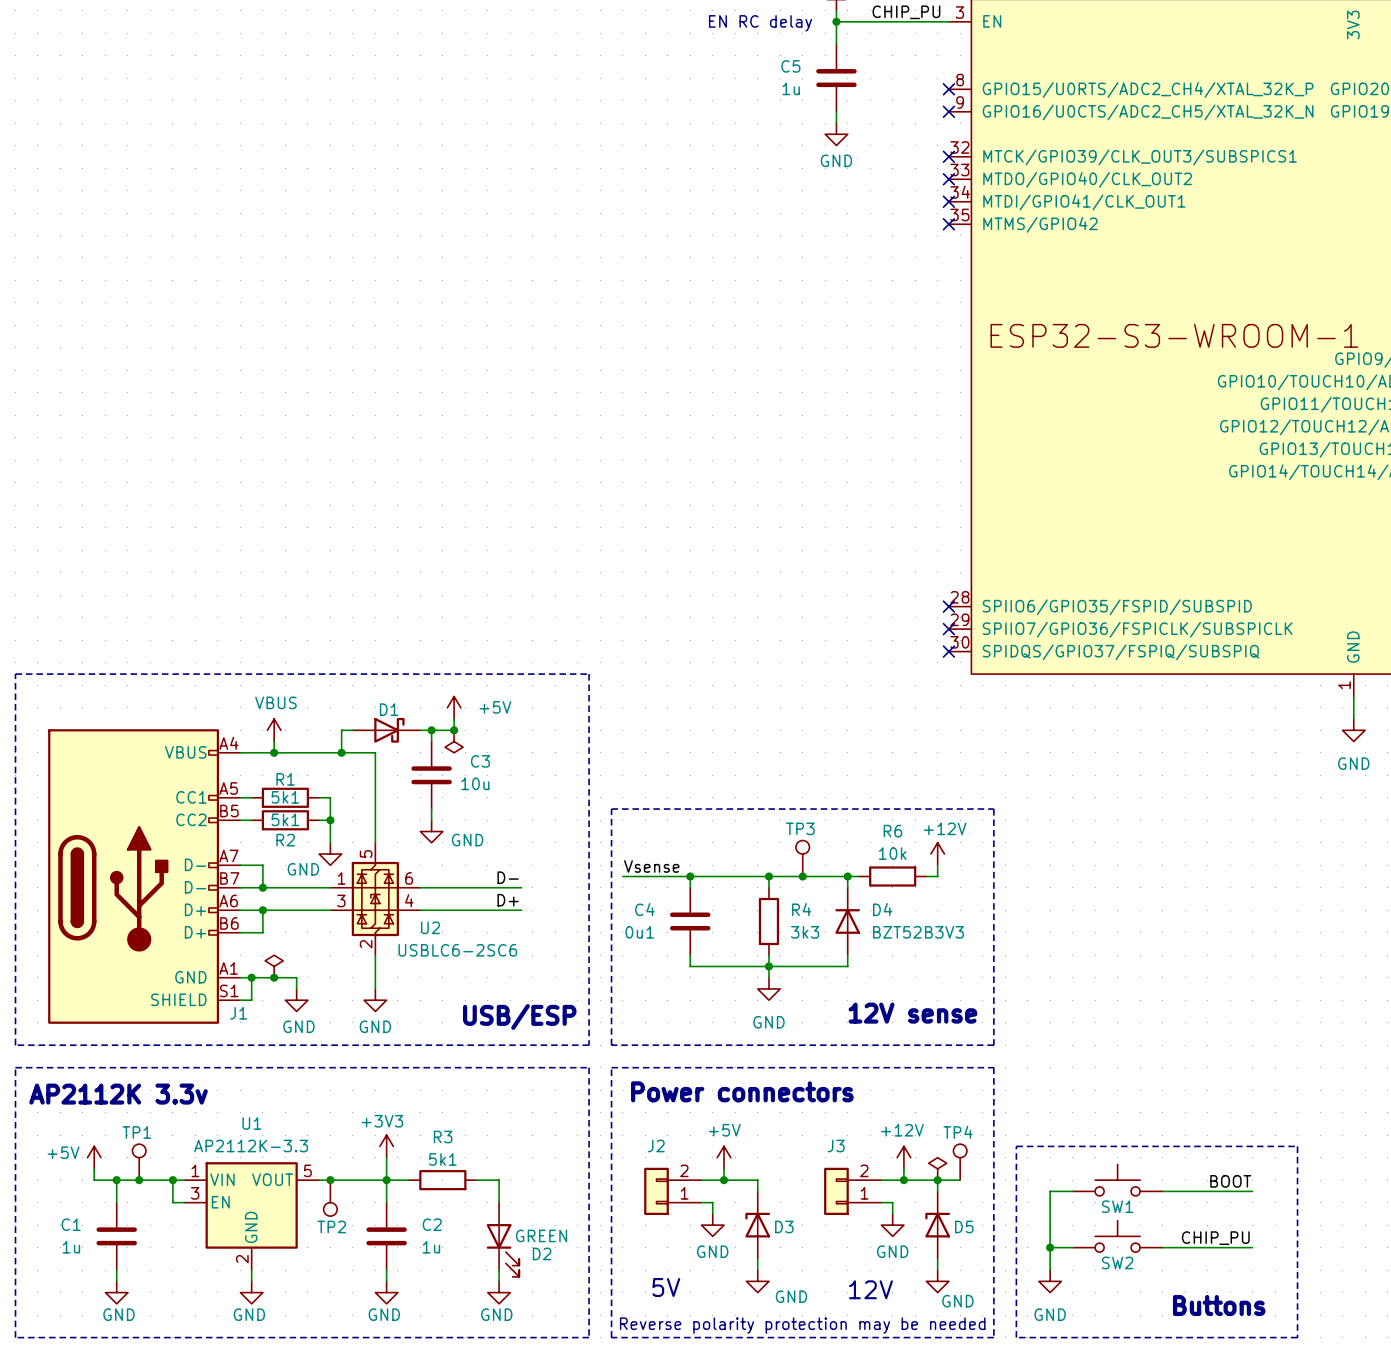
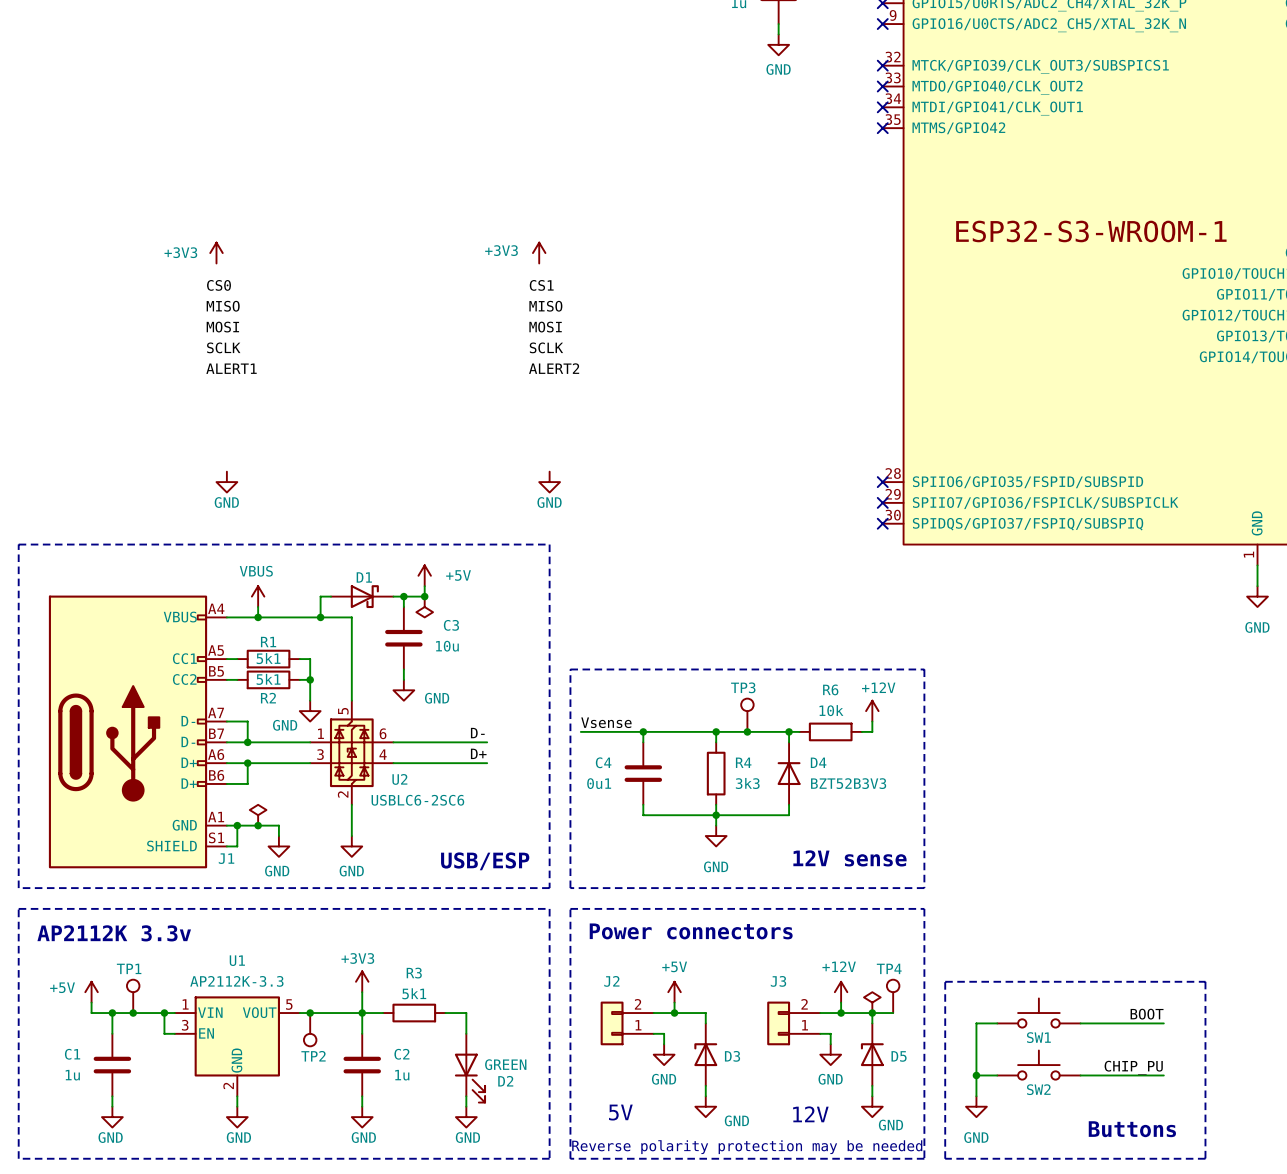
power symbol: none -> +3V3 (216, 253)
power symbol: none -> +3V3 (539, 253)
label: none -> CS0 (218, 285)
label: none -> CS1 (541, 285)
label: none -> MISO (223, 306)
label: none -> MISO (545, 306)
label: none -> MOSI (222, 327)
label: none -> MOSI (545, 327)
label: none -> SCLK (223, 347)
label: none -> SCLK (546, 347)
label: none -> ALERT1 (231, 368)
label: none -> ALERT2 (554, 368)
power symbol: none -> GND (226, 482)
power symbol: none -> GND (549, 482)

